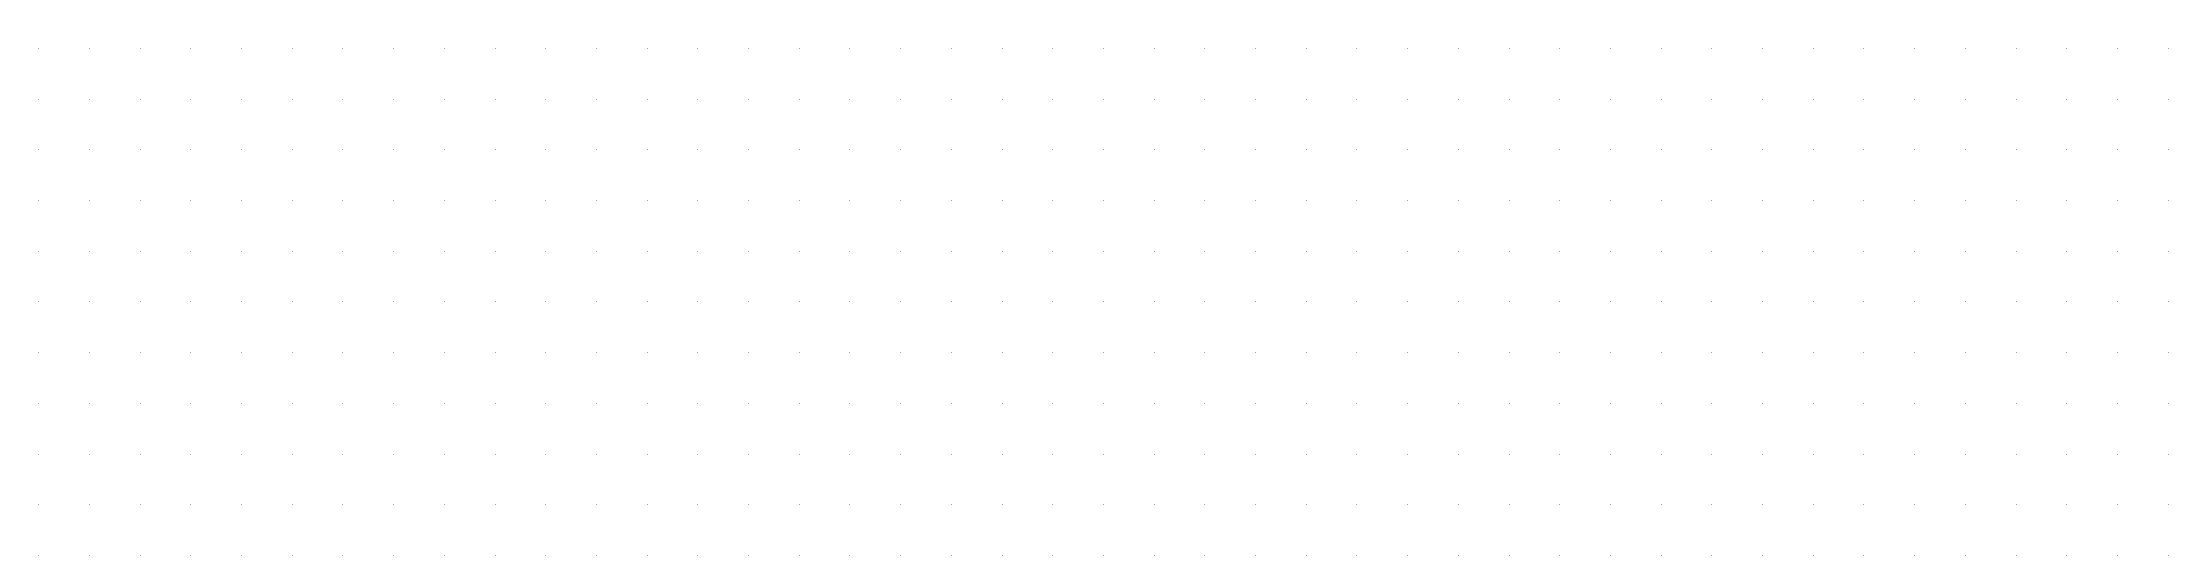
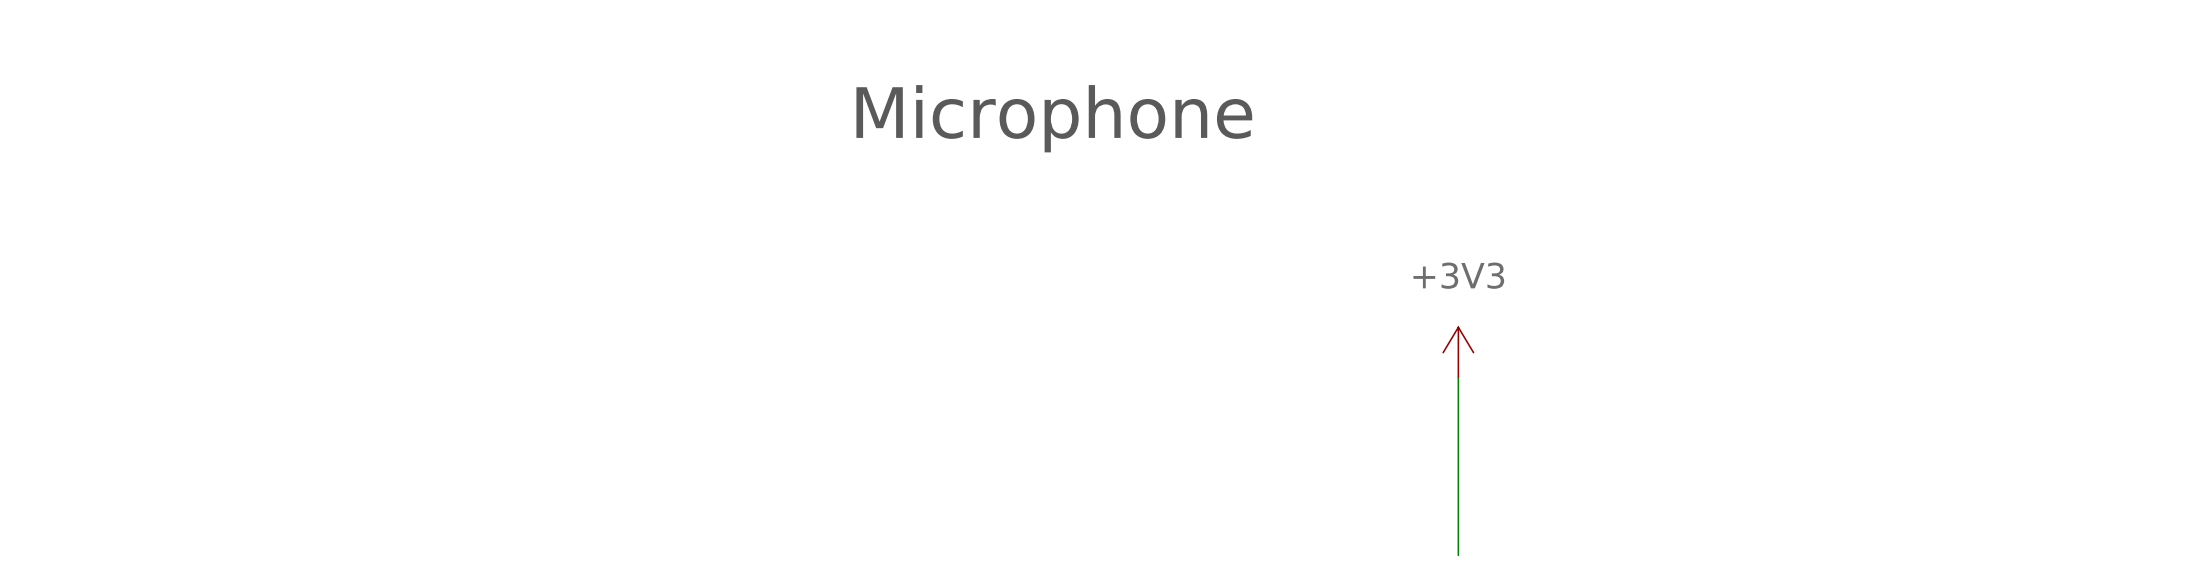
text: none -> Microphone (1054, 118)
power symbol: none -> +3V3 (1458, 352)
wire: none -> (1458, 378) (1458, 555)

